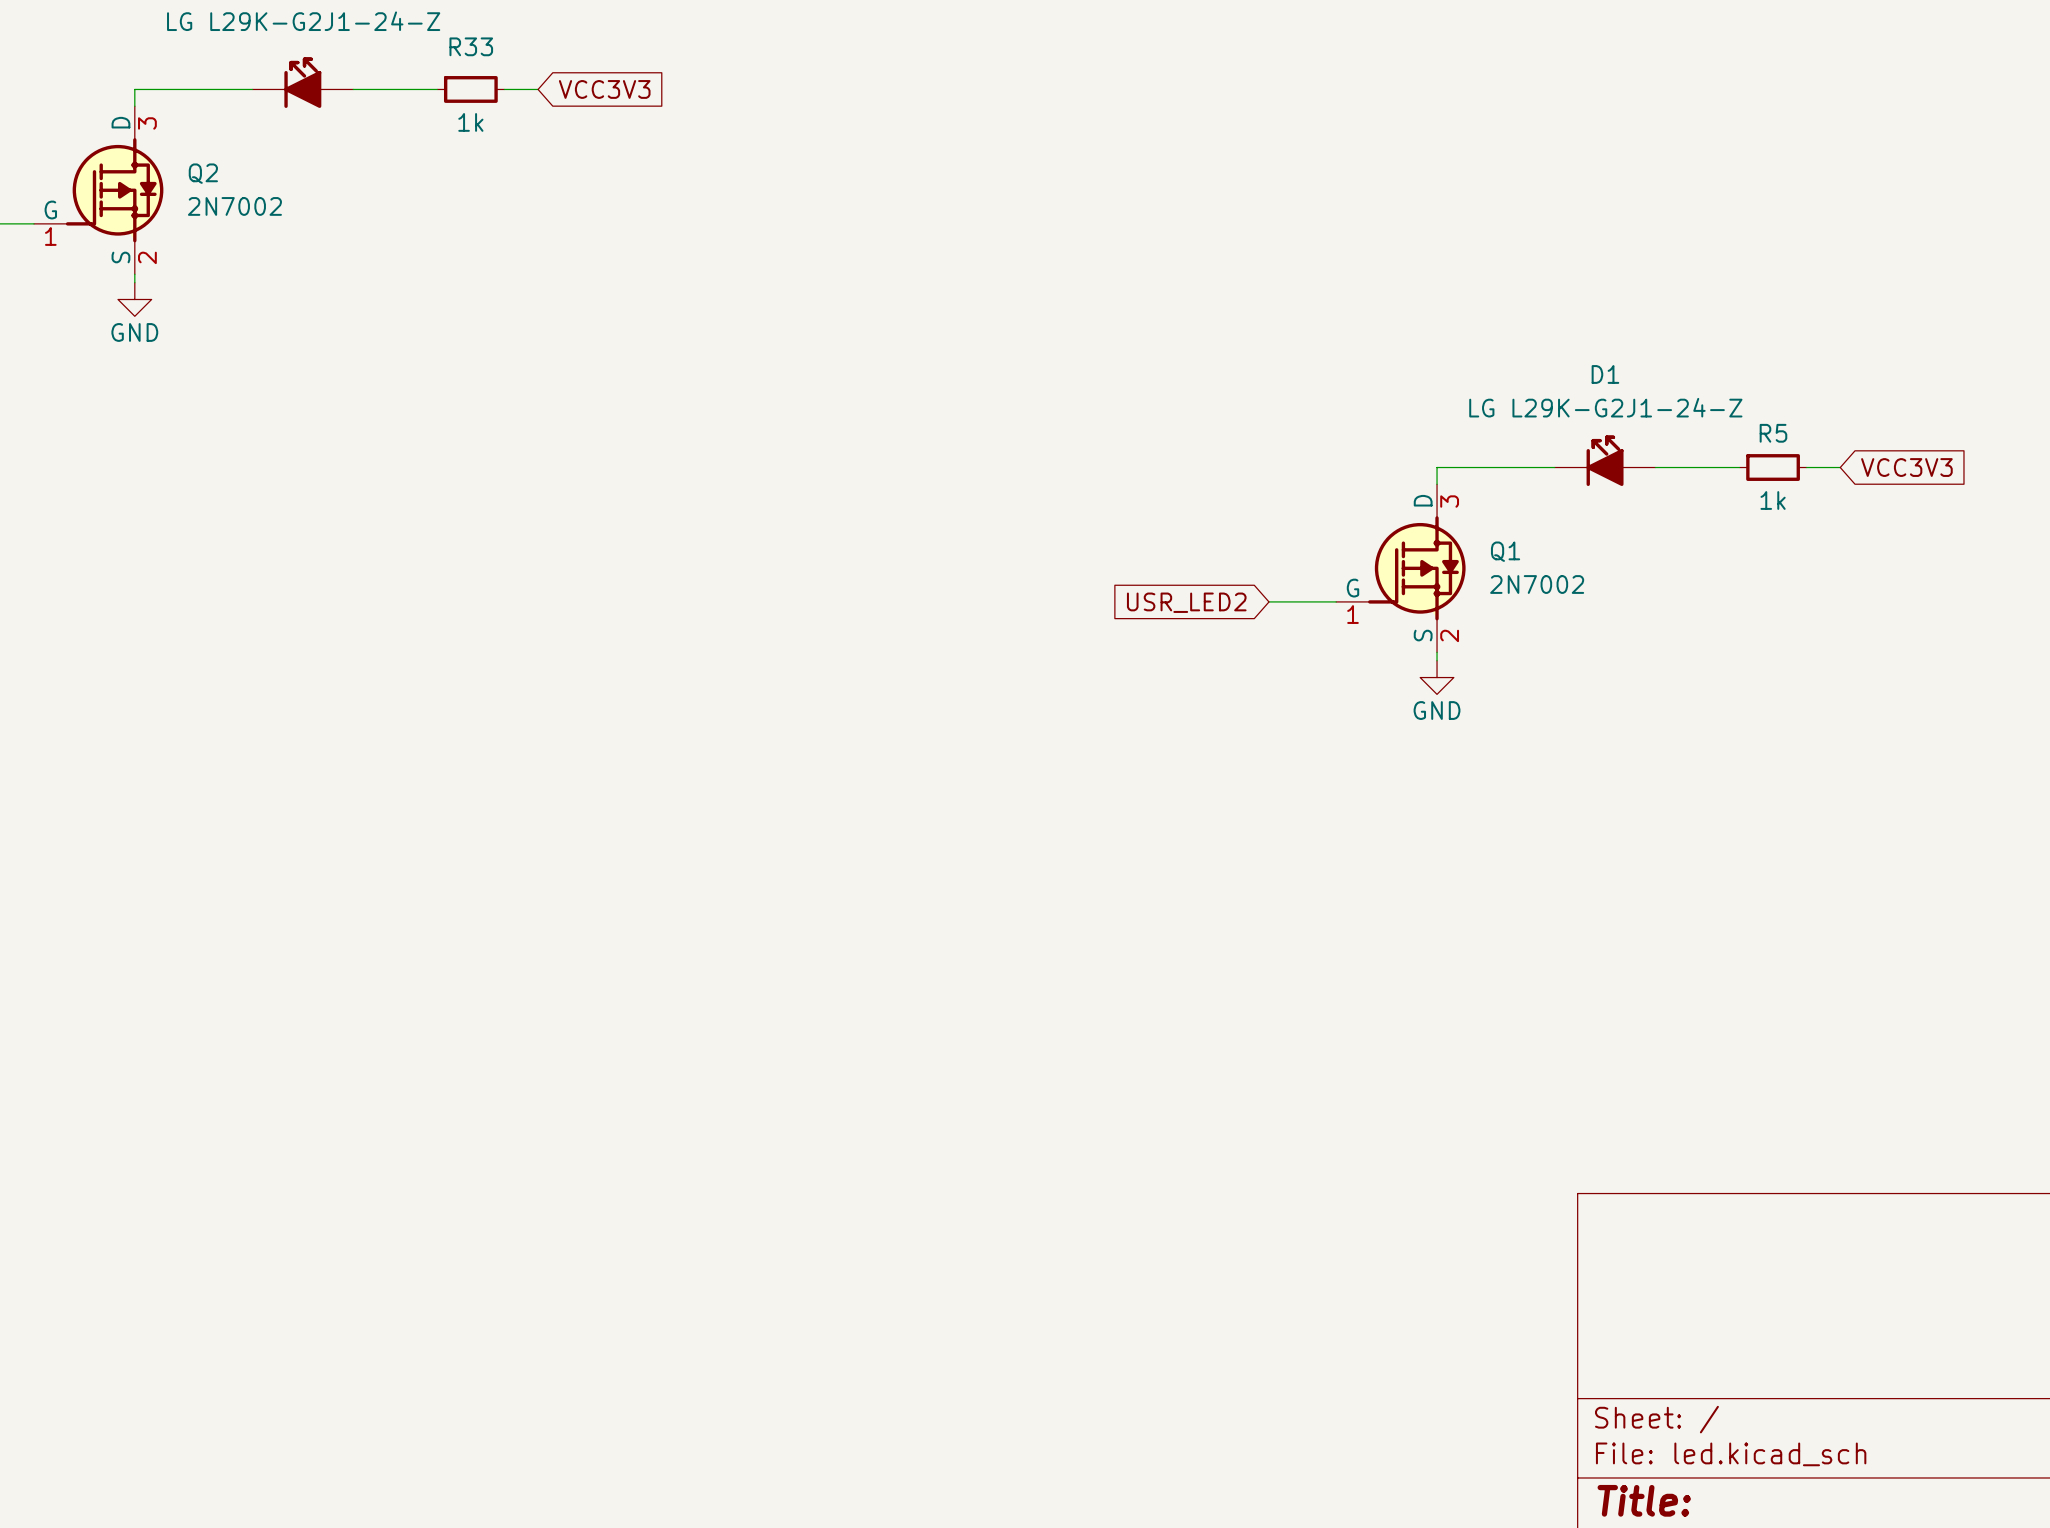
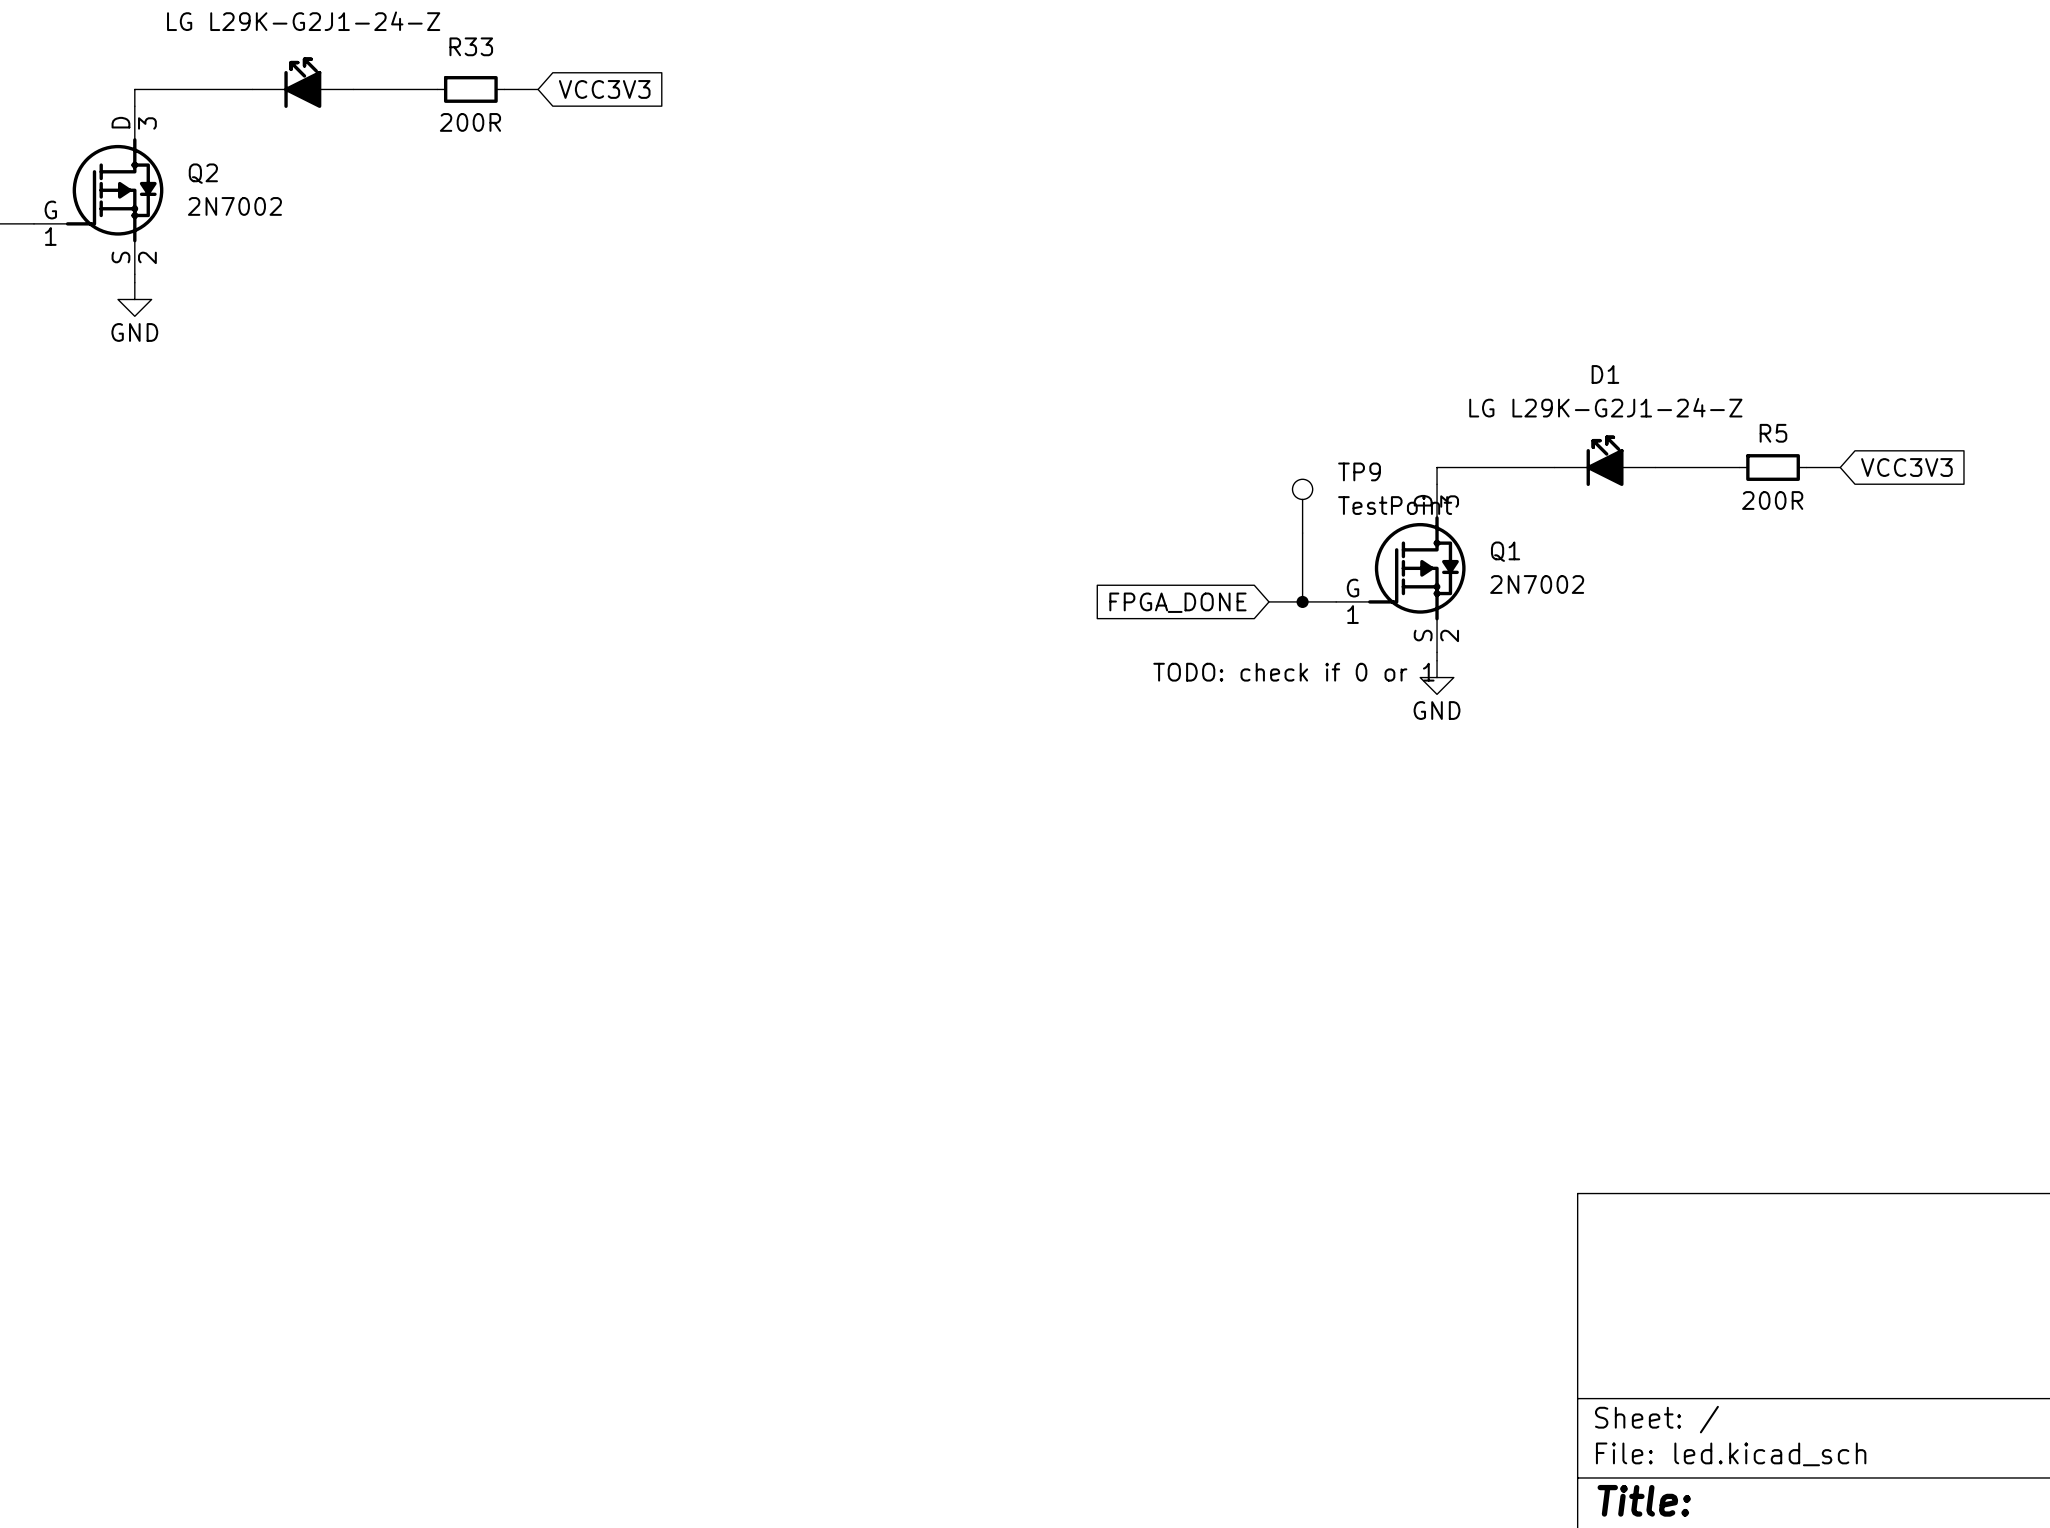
R33 text: 1k (470, 122) -> 200R (470, 122)
R5 text: 1k (1773, 500) -> 200R (1772, 500)
TP9: none -> TestPoint (1302, 506)
wire: none -> (1302, 533) (1302, 601)
junction: none -> (1302, 601)
global label: USR_LED2 (1186, 602) -> FPGA_DONE (1177, 602)
text: none -> TODO: check if 0 or 1 (1293, 672)

